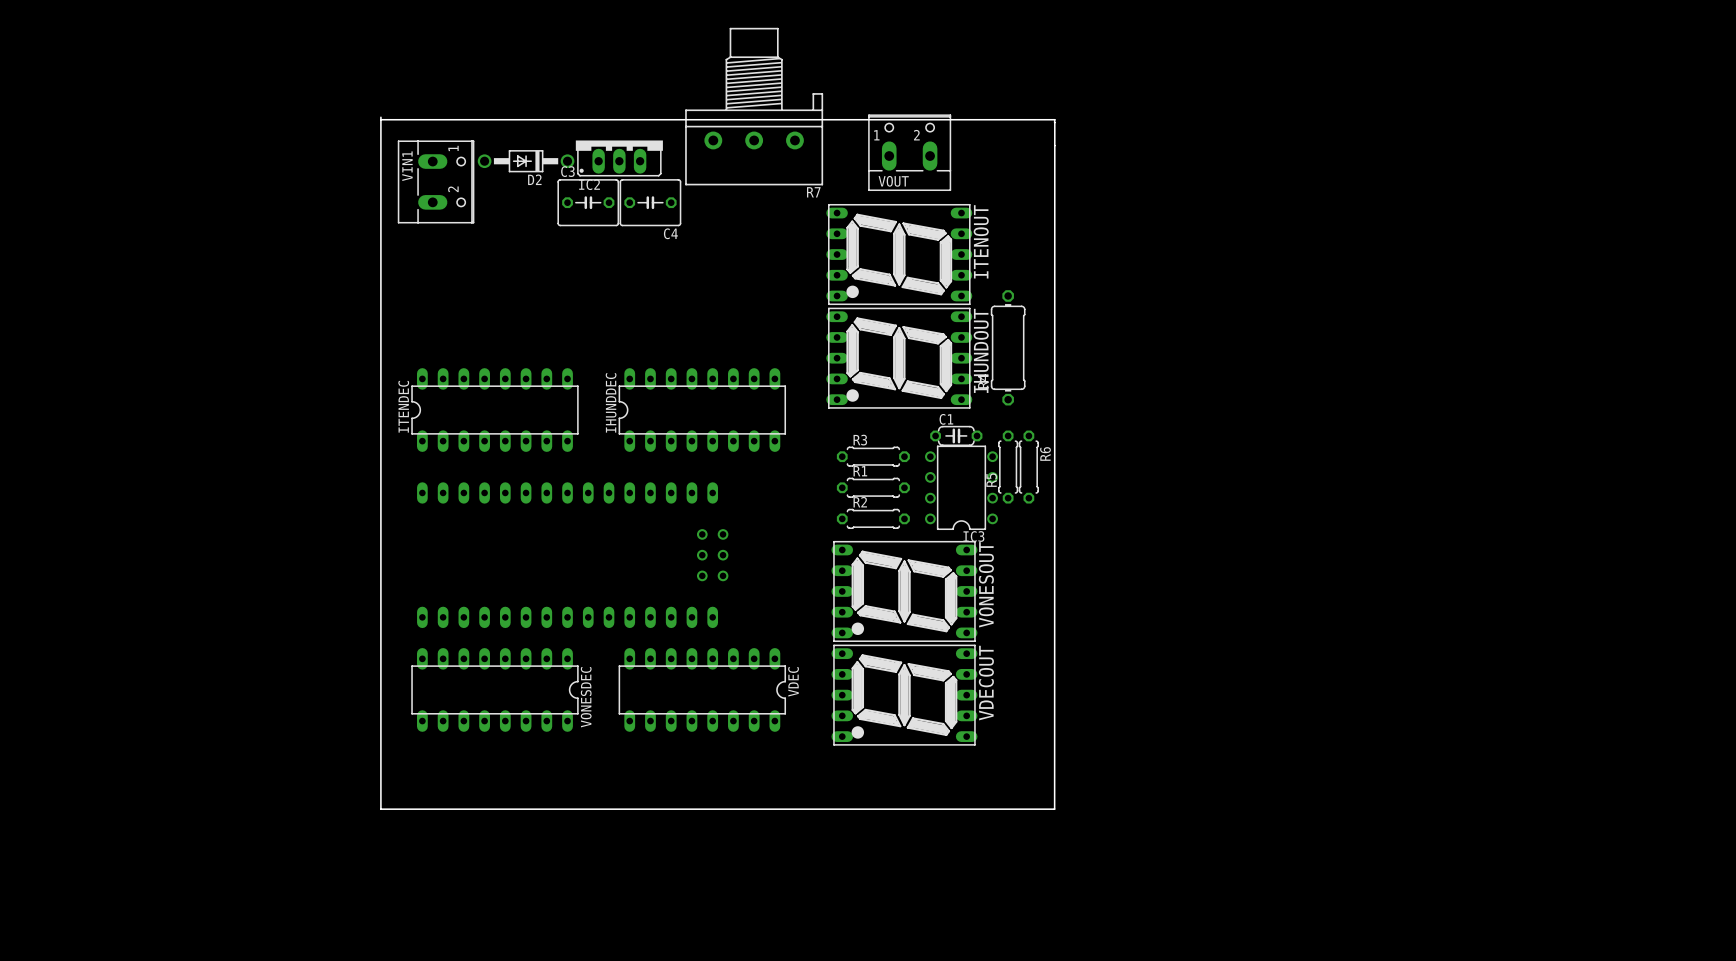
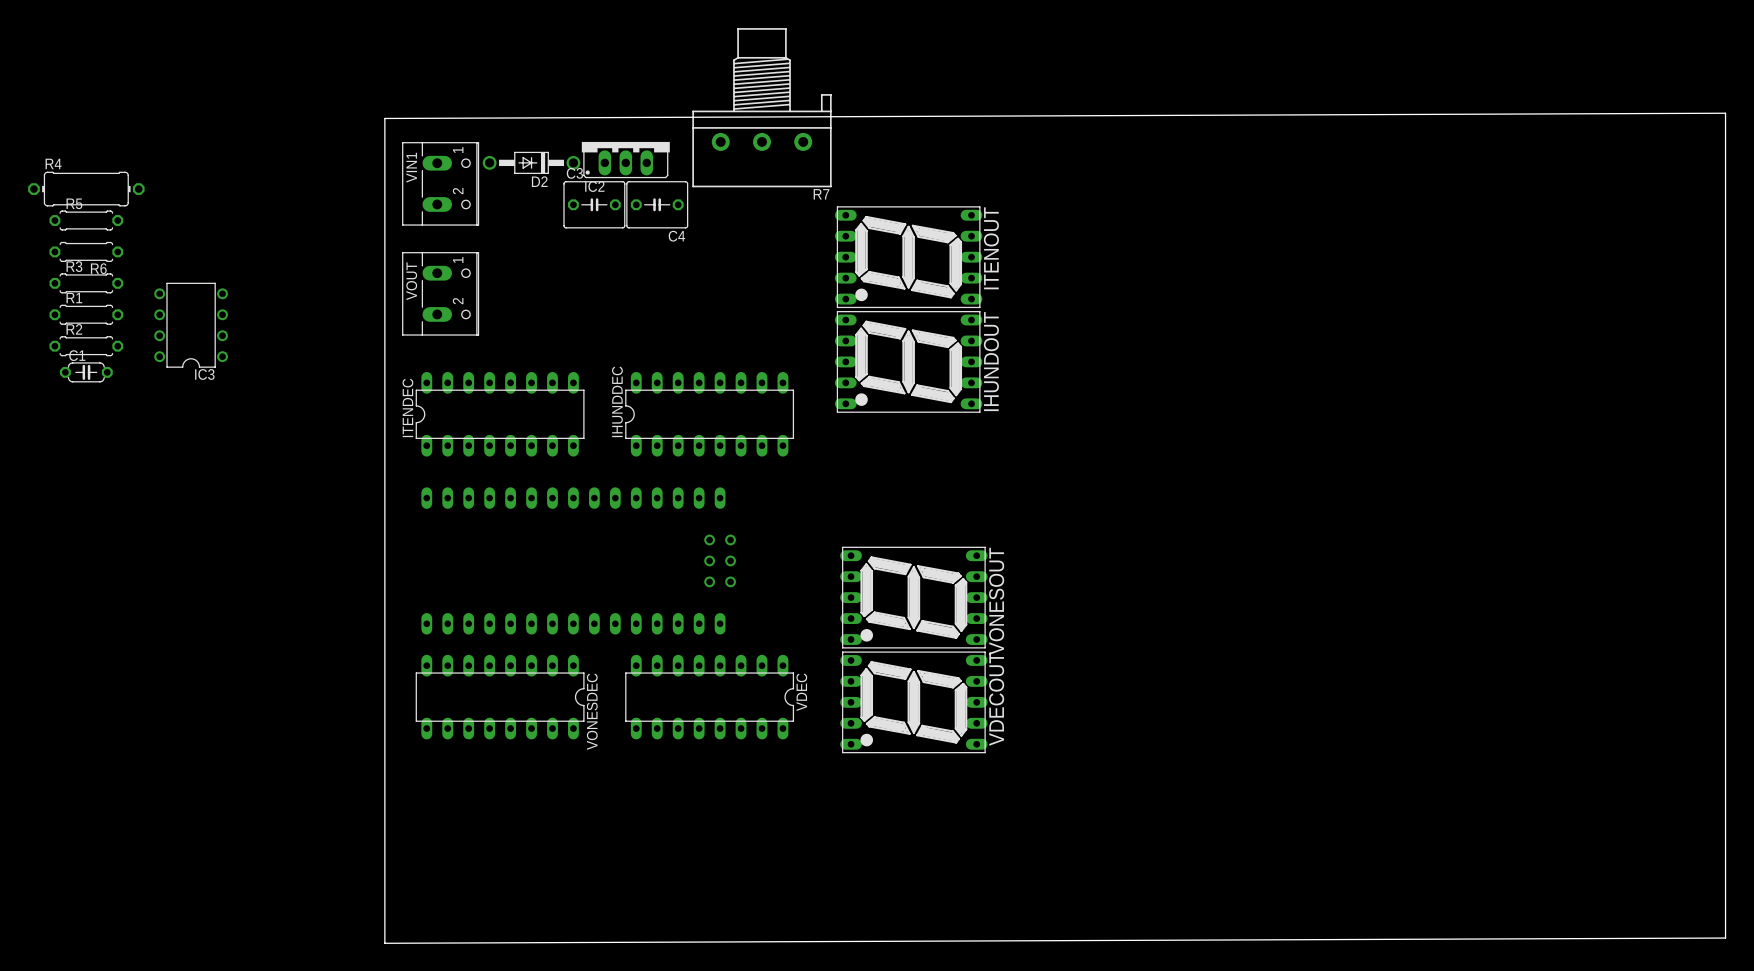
board edge: (380, 119) (1054, 119) (1054, 122) (1054, 809) (380, 809) -> (384, 118) (1725, 113) (1725, 938) (384, 943) (384, 817)
VOUT: (909, 152) -> none
VOUT: none -> (440, 293)
R4 rotation: 0° (1008, 347) -> 90° clockwise (86, 189)
R4 position: (1008, 347) -> (86, 189)
C1 position: (956, 435) -> (86, 372)
R3 position: (873, 456) -> (86, 283)
R5 rotation: 0° (1008, 467) -> 90° clockwise (86, 220)
R5 position: (1008, 467) -> (86, 220)
R6 rotation: 0° (1028, 467) -> 90° clockwise (86, 251)
R6 position: (1028, 467) -> (86, 251)
R1 position: (873, 487) -> (86, 314)
IC3 position: (961, 487) -> (191, 325)
R2 position: (873, 518) -> (86, 346)

